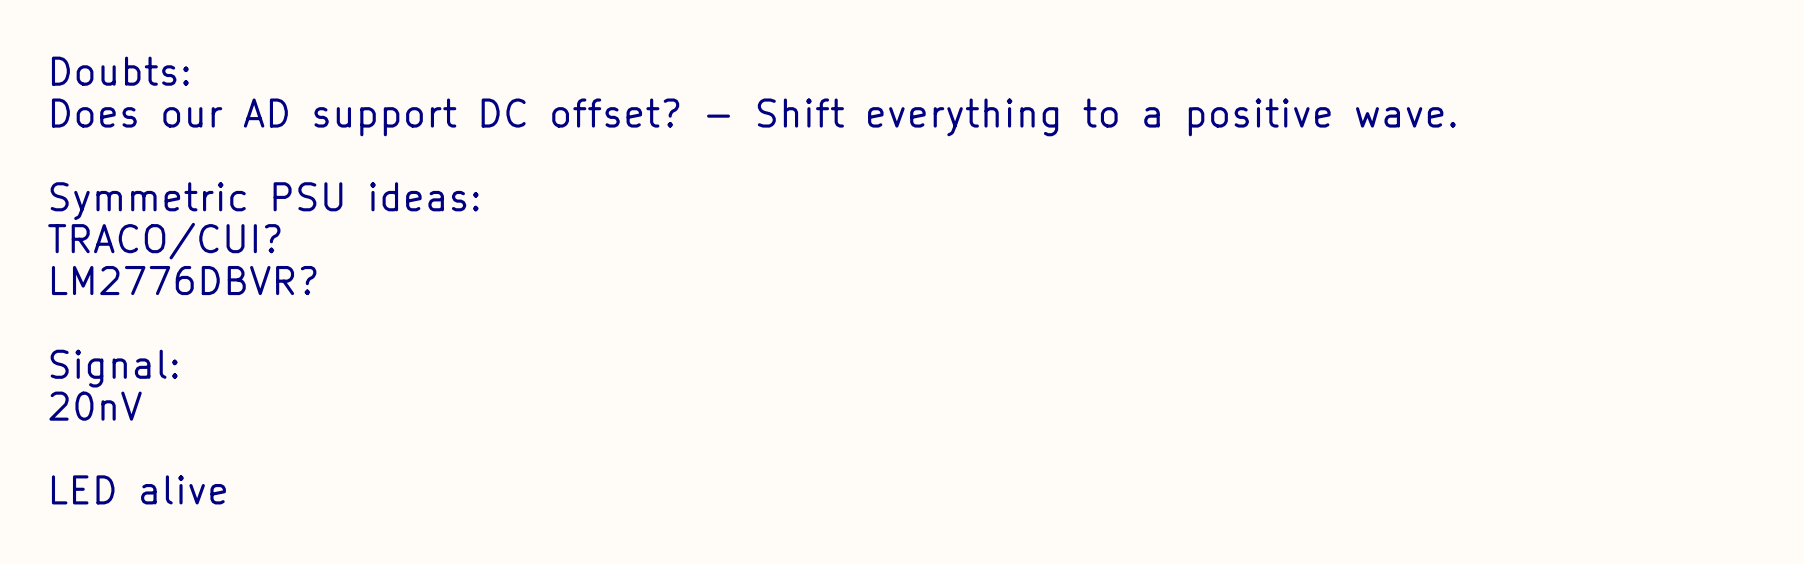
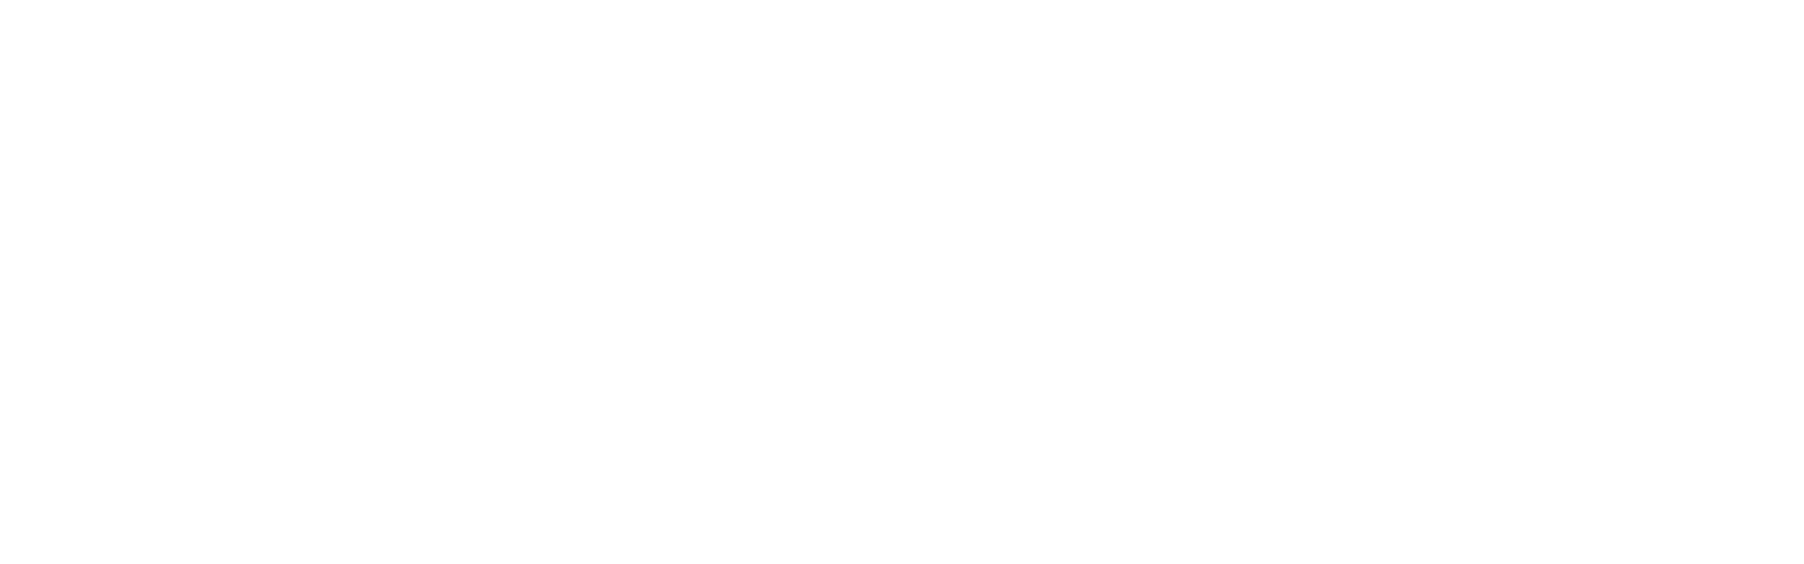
text: Doubts: (120, 71) -> none
text: Does our AD support DC offset? - Shift everything to a positive wave. (753, 117) -> none
text: Symmetric PSU ideas: (264, 201) -> none
text: TRACO/CUI? (164, 241) -> none
text: LM2776DBVR? (184, 280) -> none
text: Signal: (114, 368) -> none
text: 20nV (95, 406) -> none
text: LED alive (138, 489) -> none

